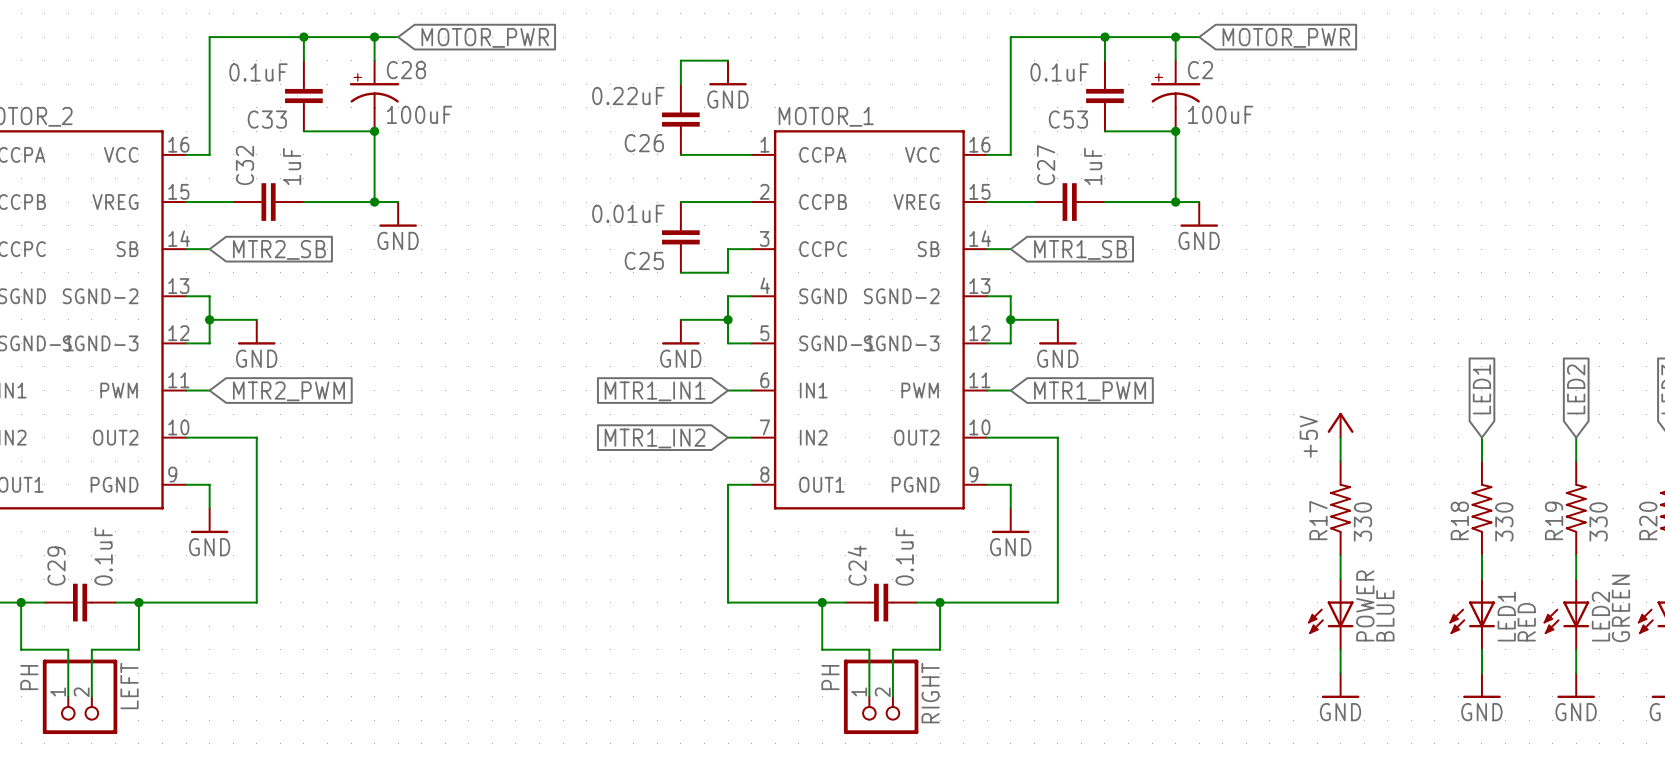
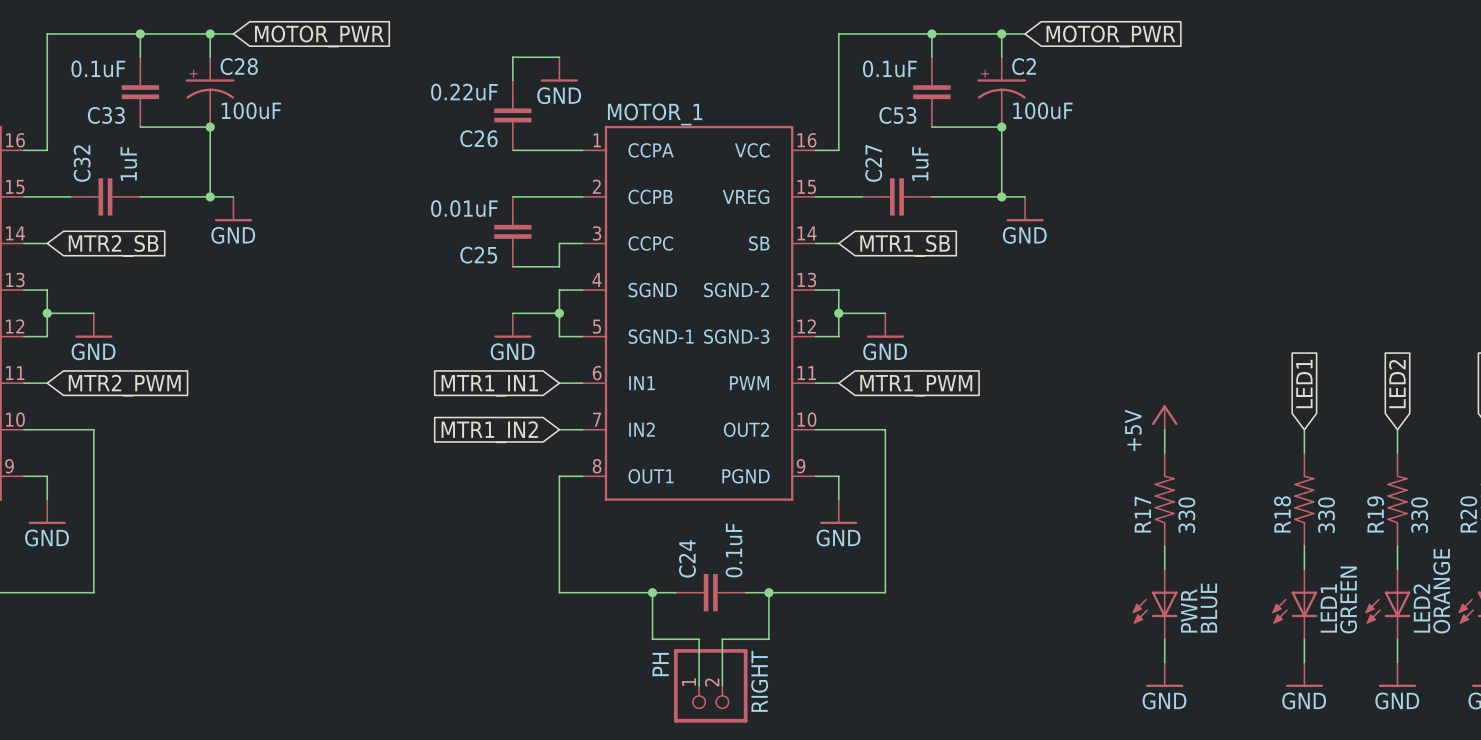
POWER name: POWER (1365, 605) -> PWR (1189, 610)
LED2 value: GREEN (1620, 608) -> ORANGE (1441, 591)
LED1 value: RED (1526, 622) -> GREEN (1348, 600)

